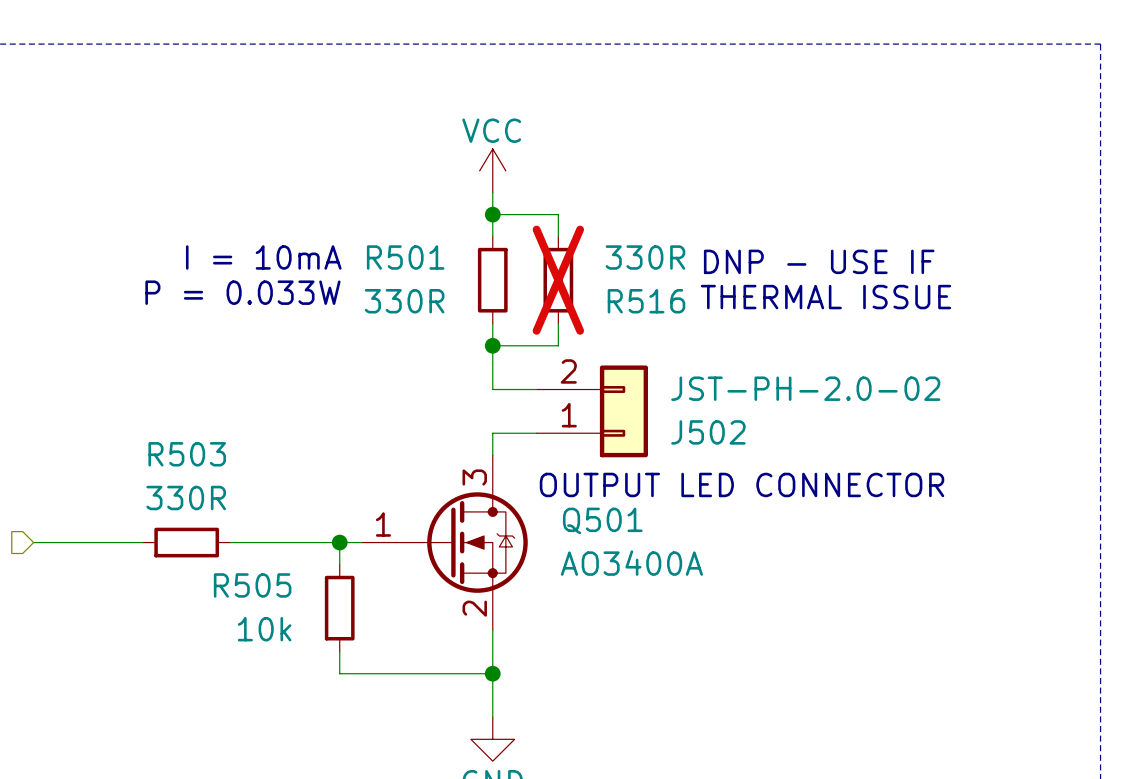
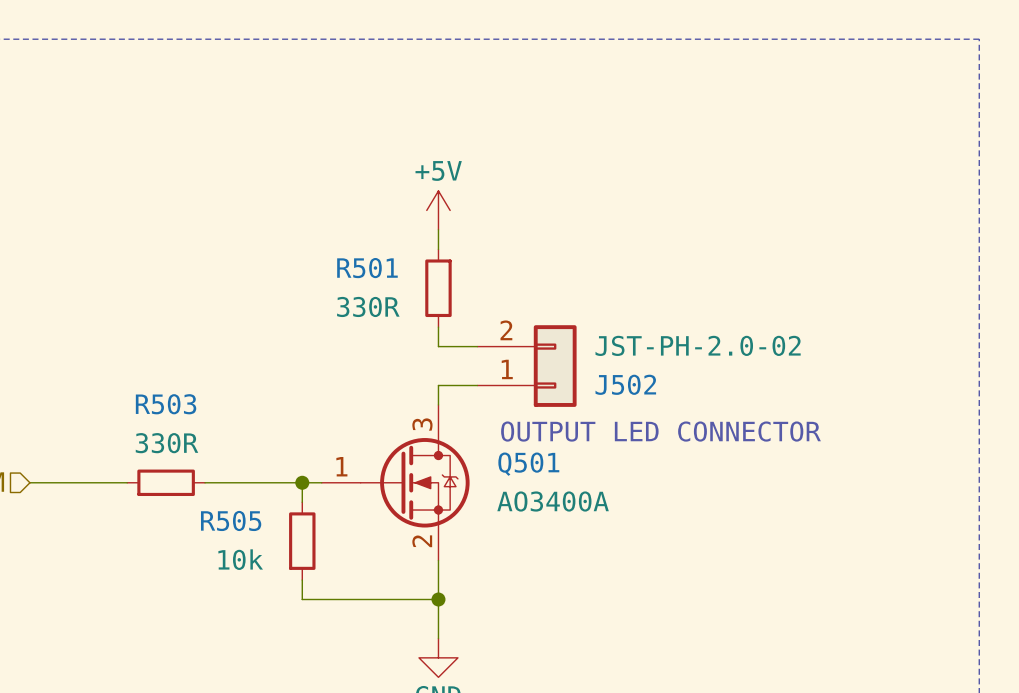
power symbol: VCC (492, 170) -> none
wire: (492, 214) (558, 214) (558, 236) -> none
junction: (492, 214) -> none
power symbol: none -> +5V (438, 210)
text: I = 10mA (263, 257) -> none
wire: none -> (438, 229) (438, 249)
text: DNP - USE IF (819, 261) -> none
R501 position: (492, 280) -> (438, 288)
R516: 330R (558, 280) -> none
text: P = 0.033W (242, 292) -> none
text: THERMAL ISSUE (825, 297) -> none
wire: (492, 323) (492, 367) -> none
wire: (558, 323) (558, 345) (492, 345) -> none
junction: (492, 345) -> none

